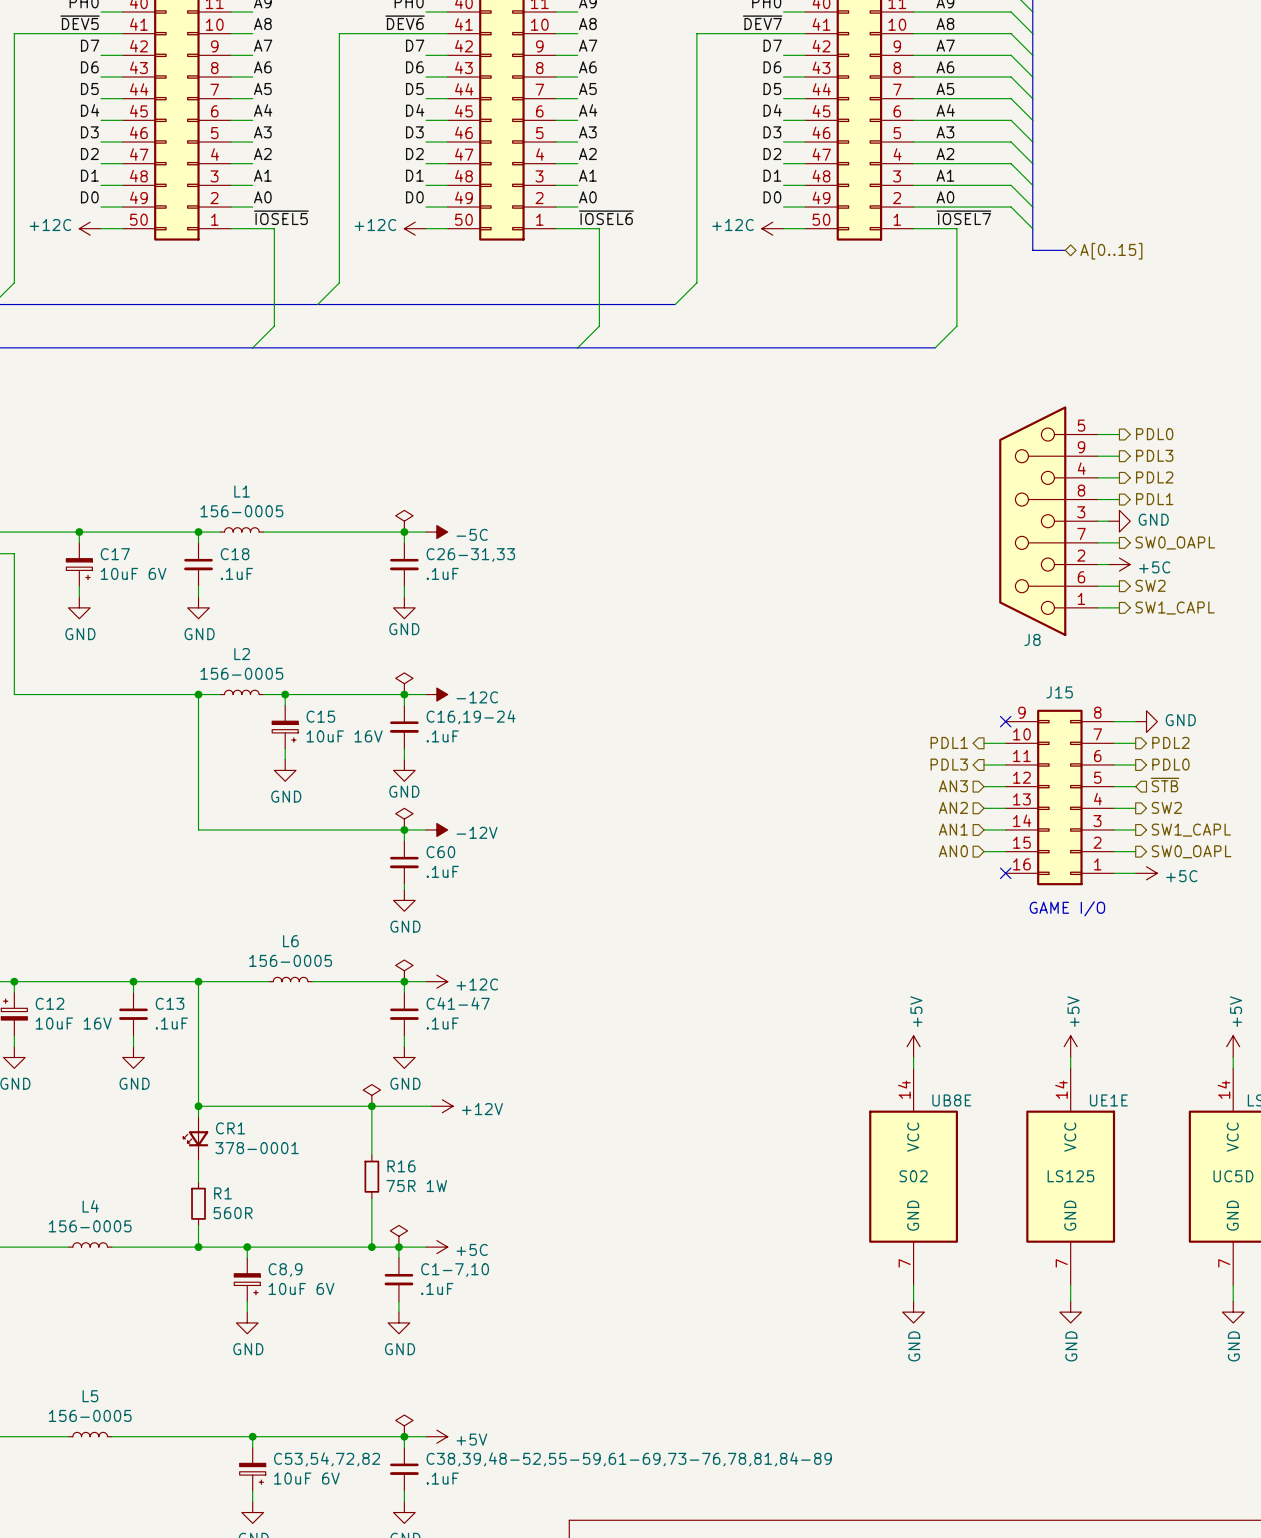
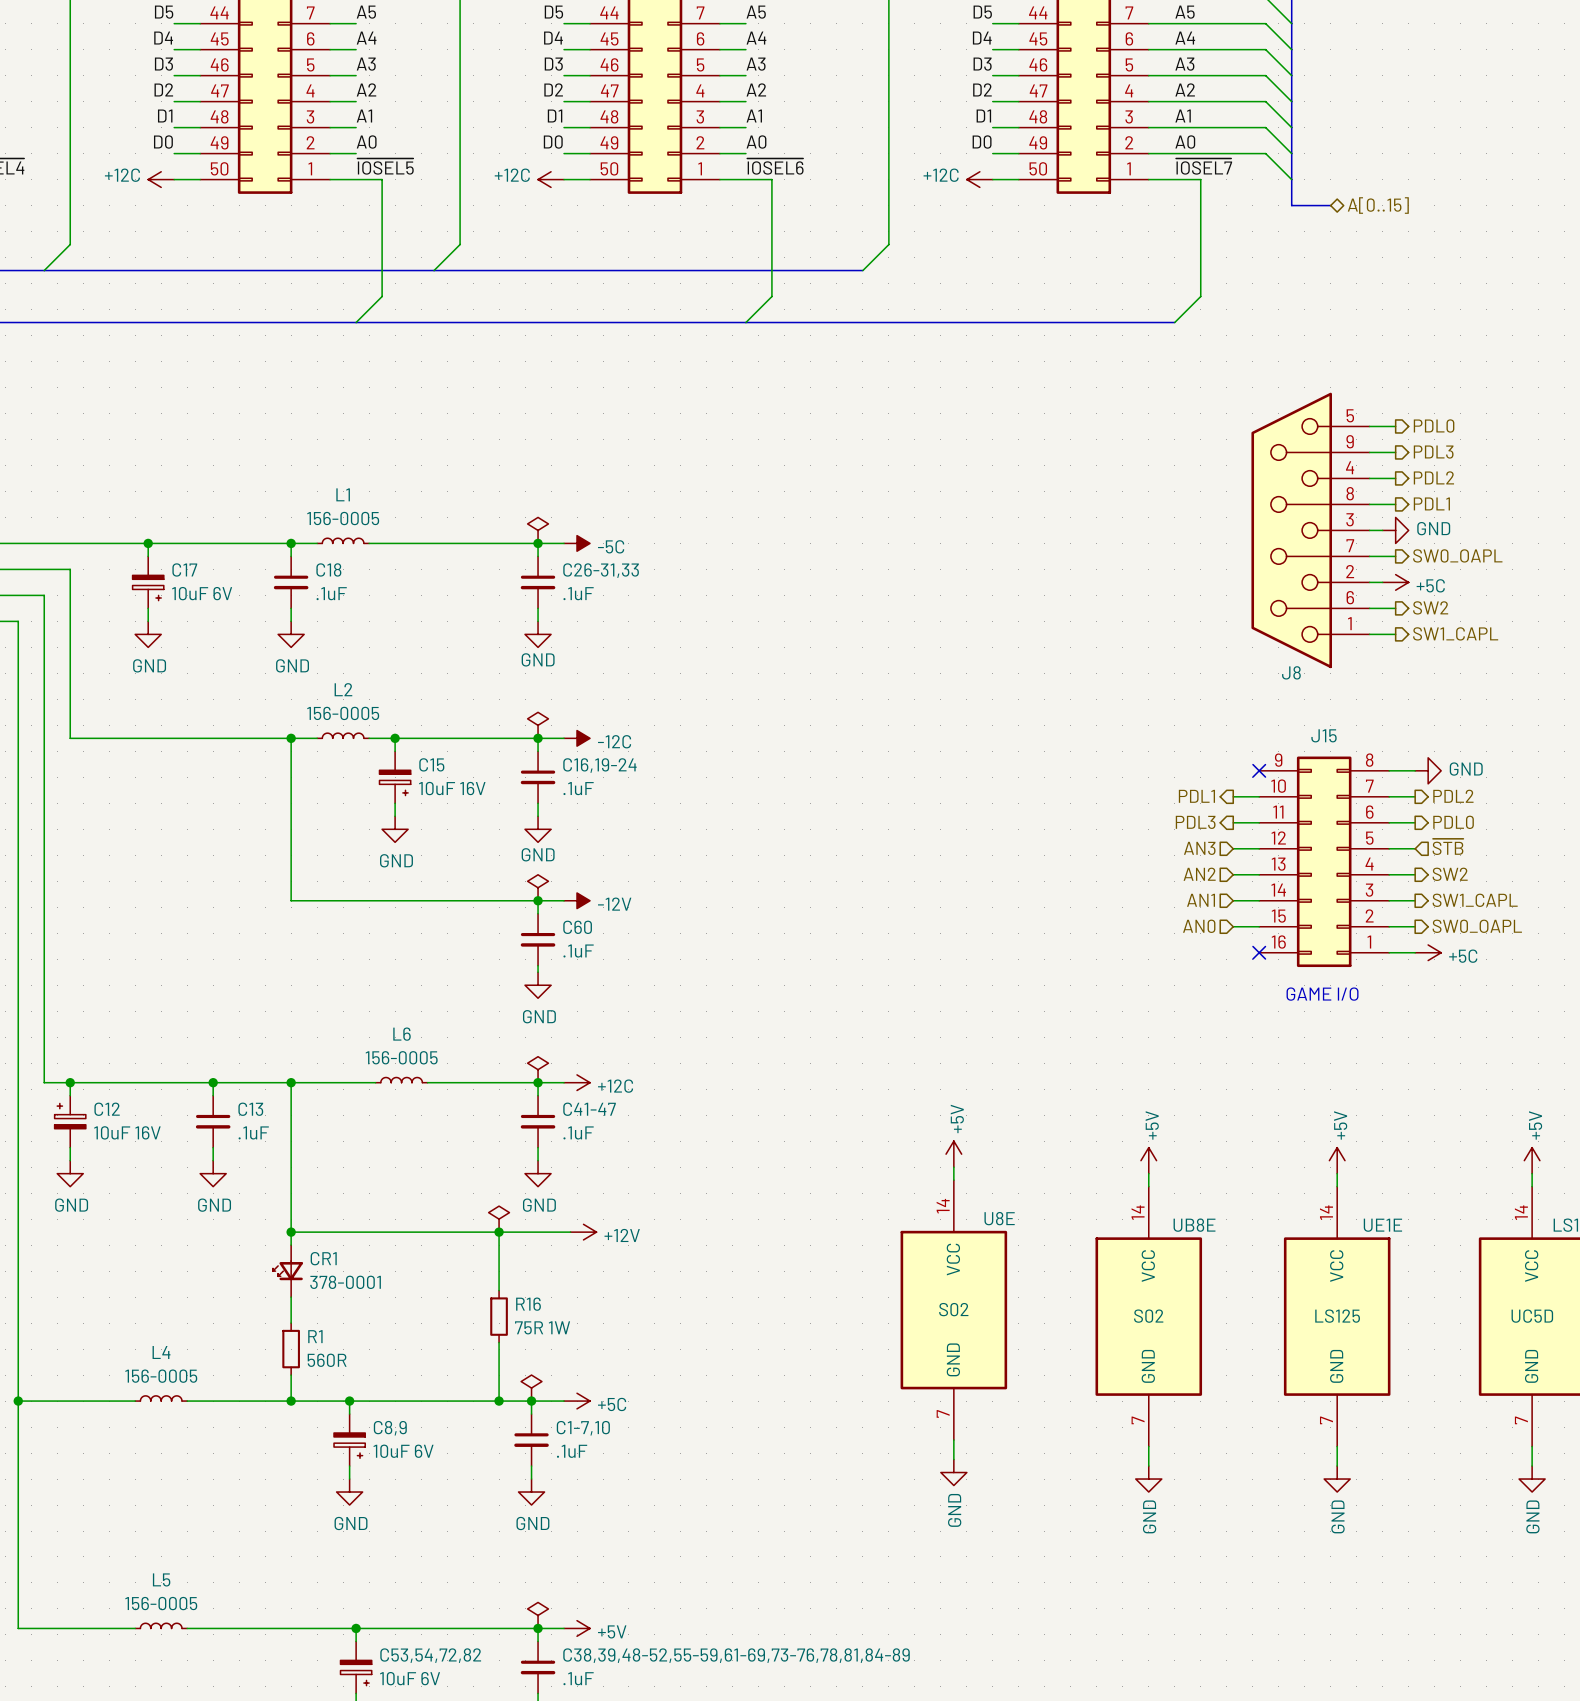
power symbol: none -> +5V (953, 1154)
wire: none -> (953, 1167) (953, 1180)
U8E: none -> S02 (953, 1310)
wire: none -> (953, 1440) (953, 1459)
power symbol: none -> GND (953, 1472)

